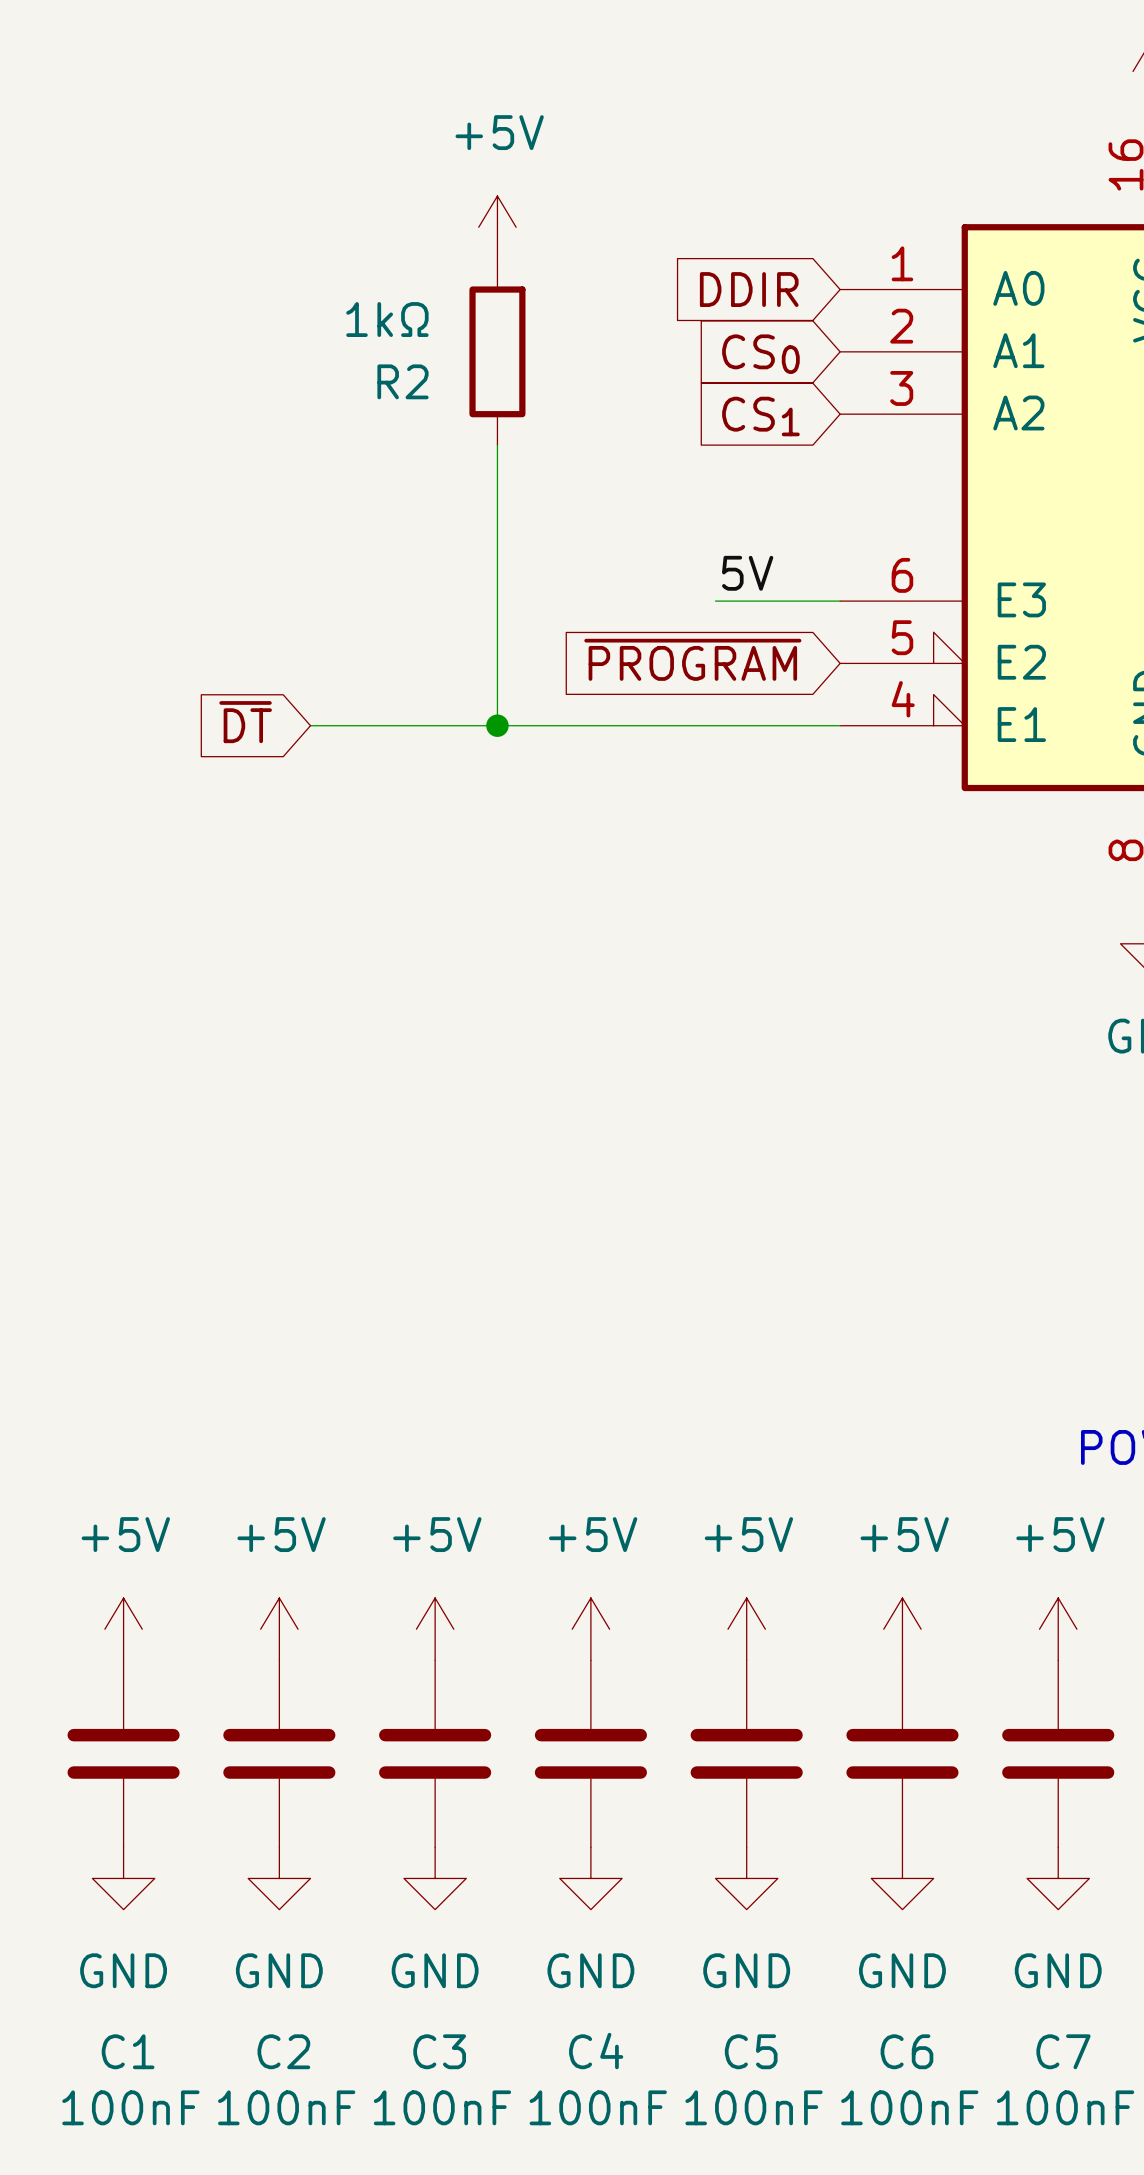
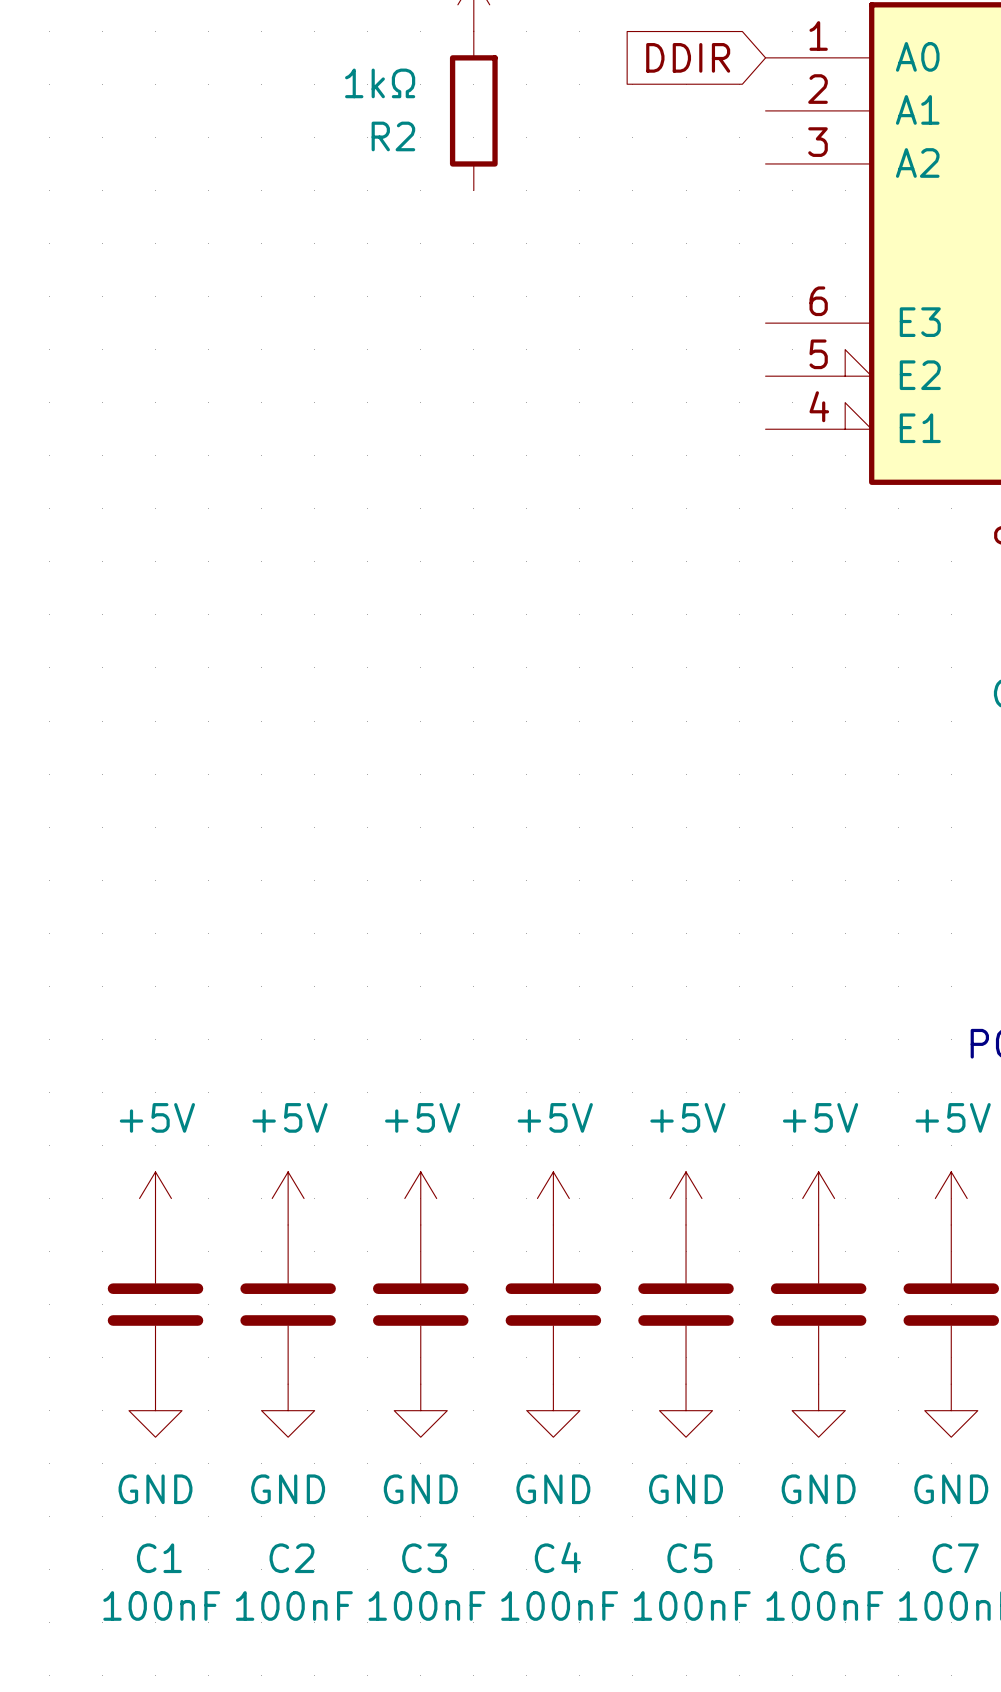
global label: CS0 (760, 354) -> none
global label: CS1 (760, 416) -> none
wire: (497, 445) (497, 725) -> none
label: 5V (747, 573) -> none
wire: (715, 601) (840, 601) -> none
global label: ~{PROGRAM} (692, 659) -> none
global label: ~{DT} (245, 722) -> none
wire: (310, 725) (840, 725) -> none
junction: (497, 725) -> none

